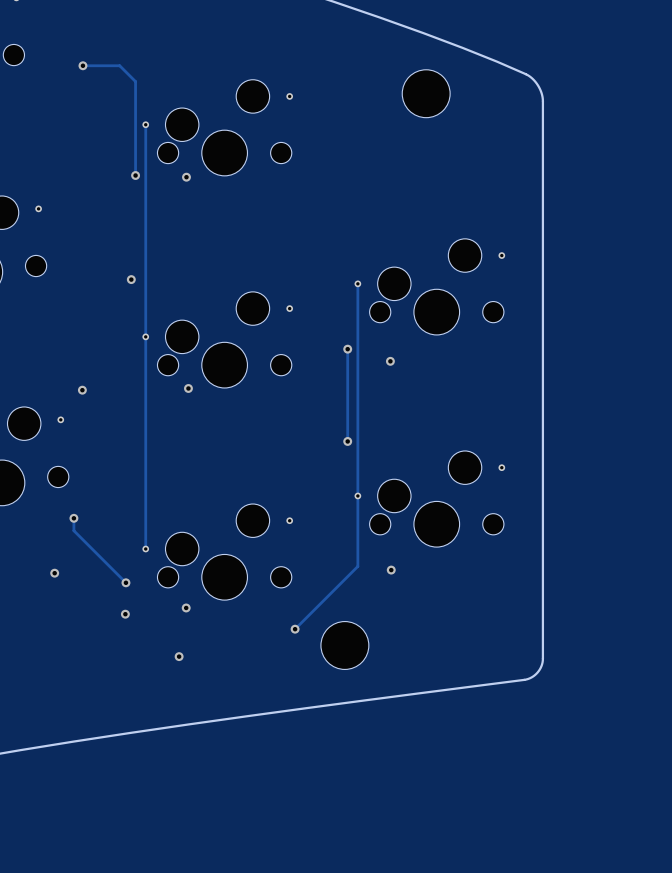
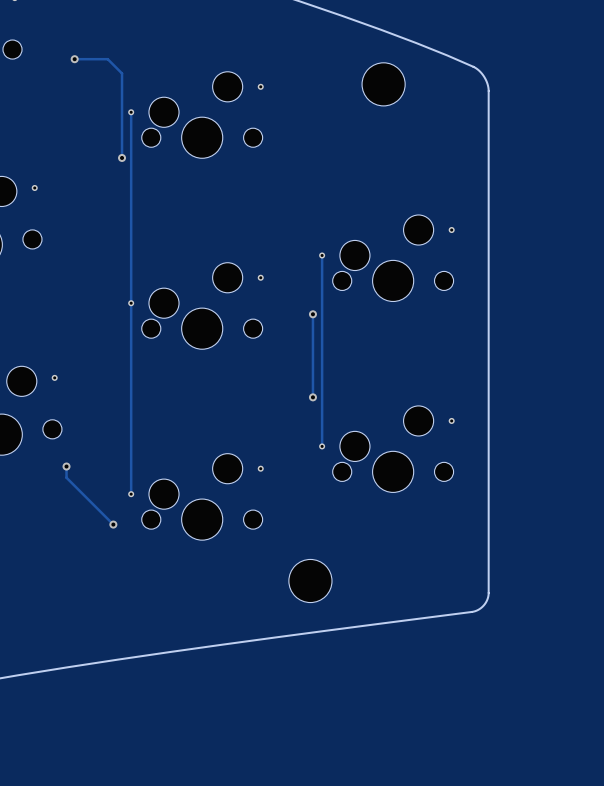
via: (186, 177) -> none
via: (131, 279) -> none
via: (390, 361) -> none
via: (188, 388) -> none
via: (82, 390) -> none
track: (357, 495) (357, 566) (295, 629) -> none
via: (391, 570) -> none
via: (54, 573) -> none
via: (186, 607) -> none
via: (125, 614) -> none
via: (295, 629) -> none
via: (179, 656) -> none

